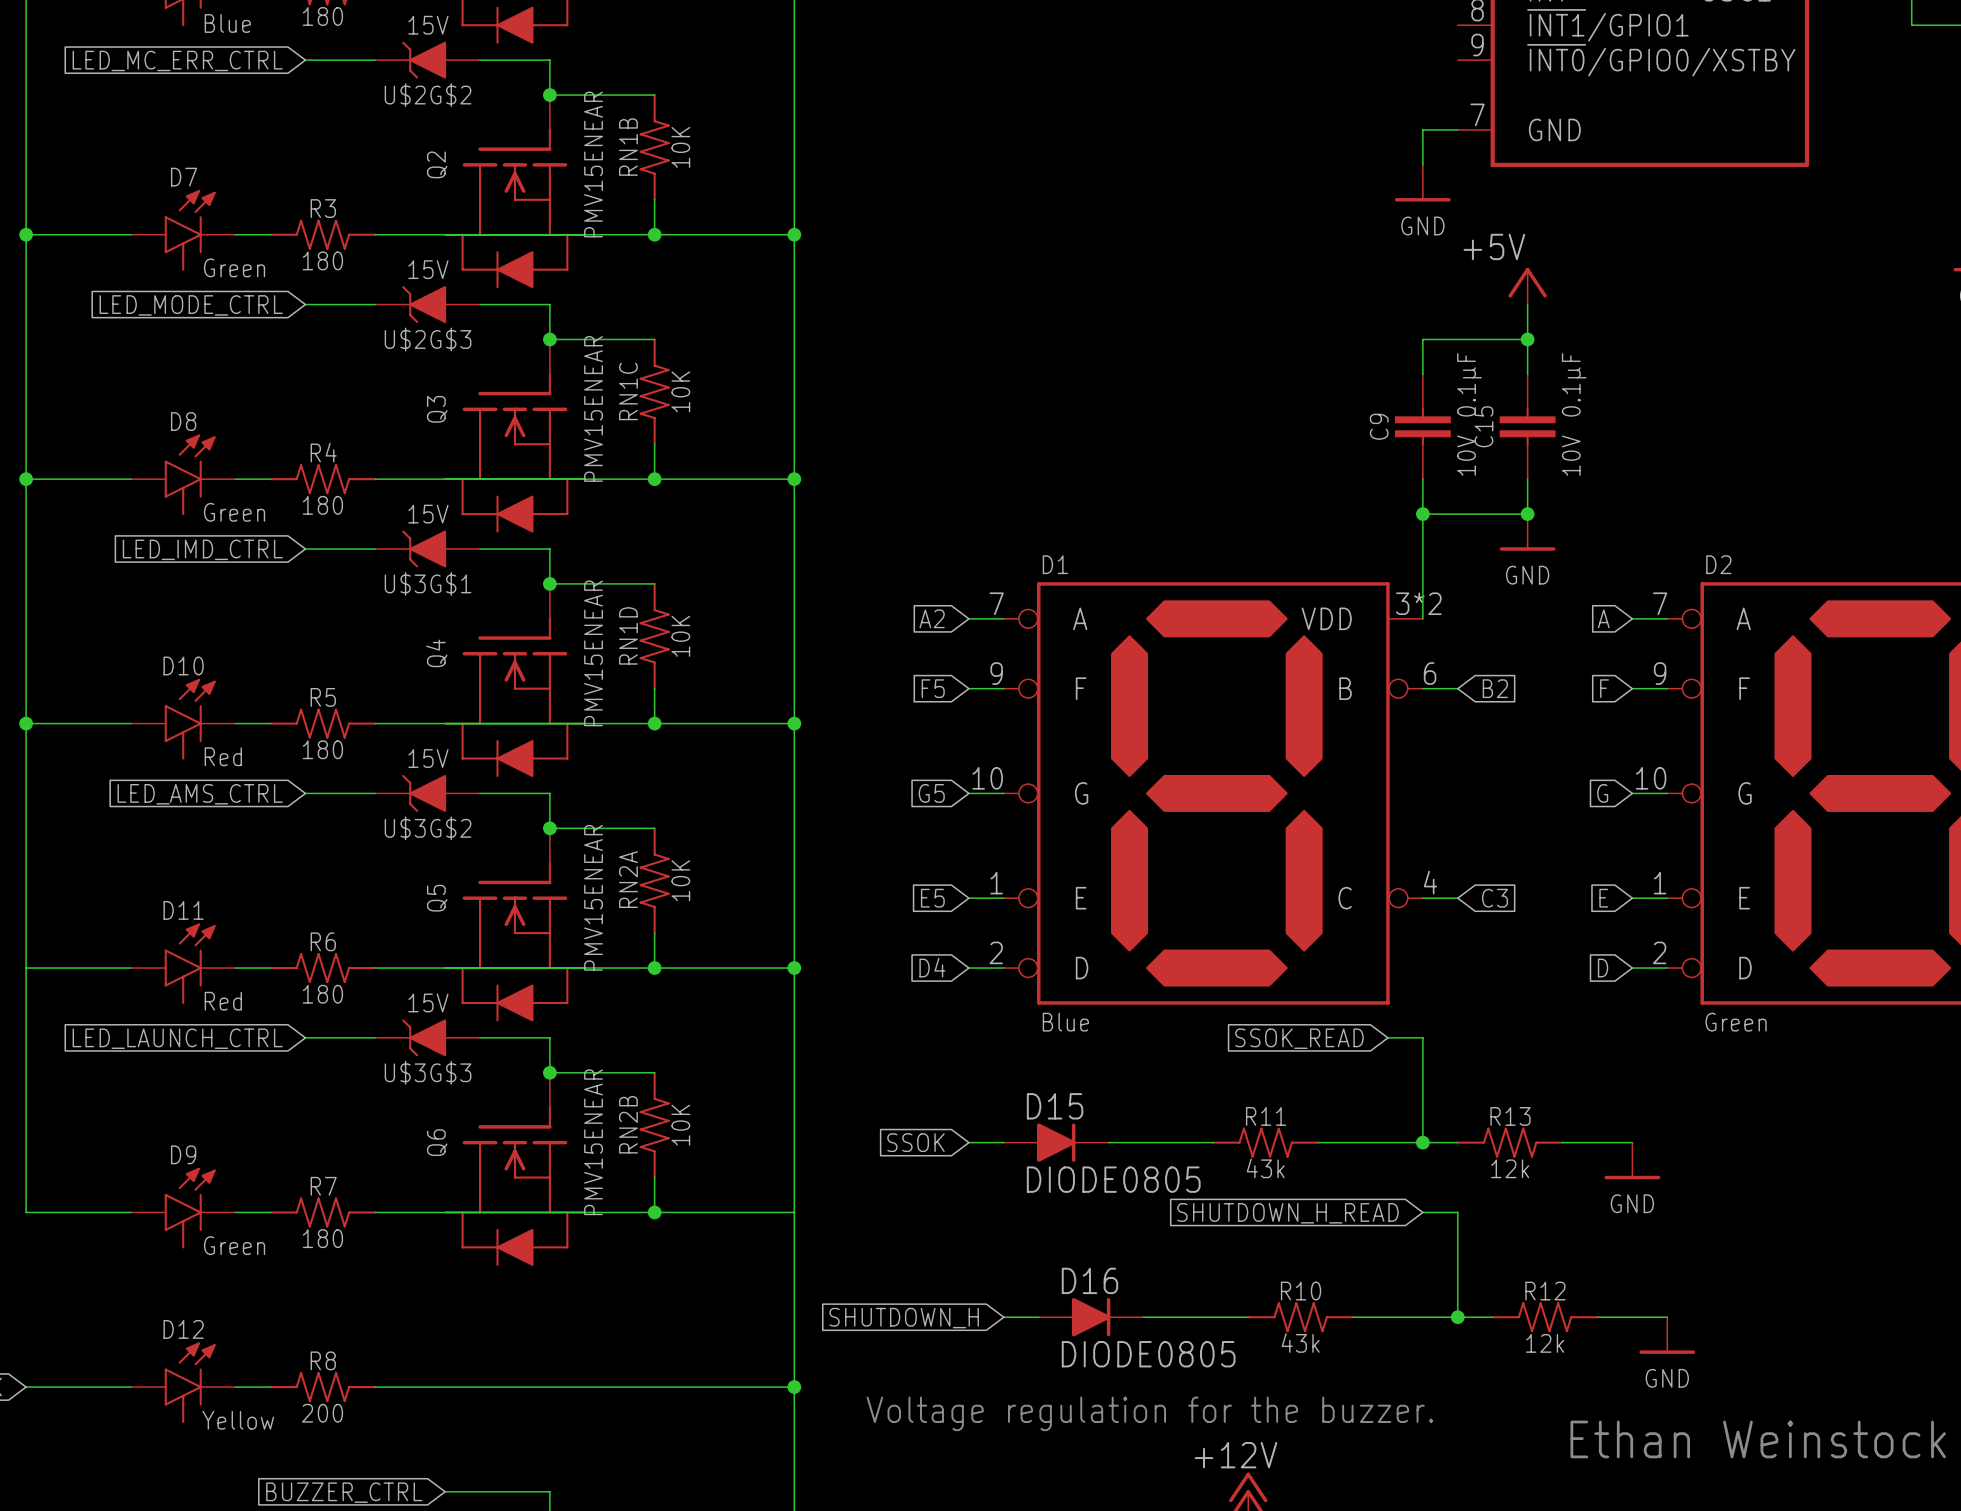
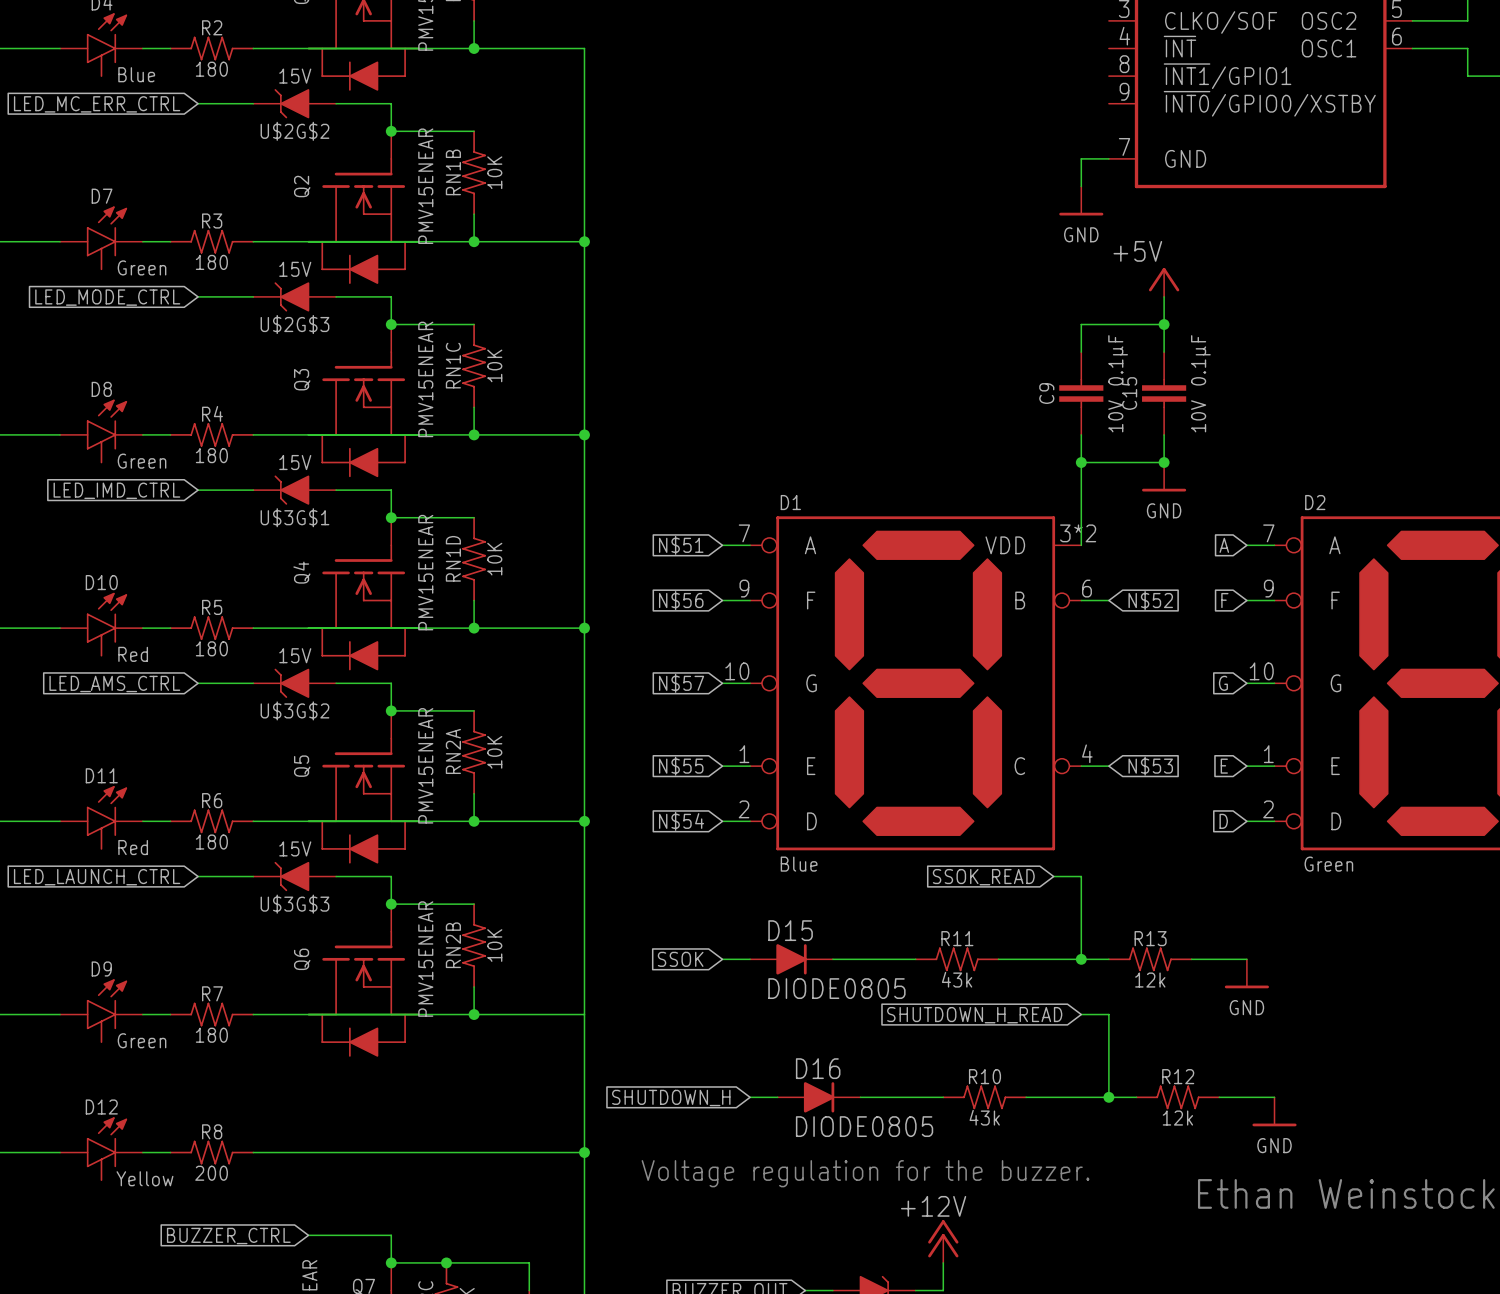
global label: A2 (932, 618) -> N$51 (681, 545)
global label: F5 (933, 688) -> N$56 (681, 600)
global label: B2 (1495, 688) -> N$52 (1150, 600)
global label: G5 (931, 793) -> N$57 (681, 683)
global label: E5 (932, 898) -> N$55 (681, 766)
global label: C3 (1494, 898) -> N$53 (1150, 766)
global label: D4 (932, 967) -> N$54 (681, 821)

